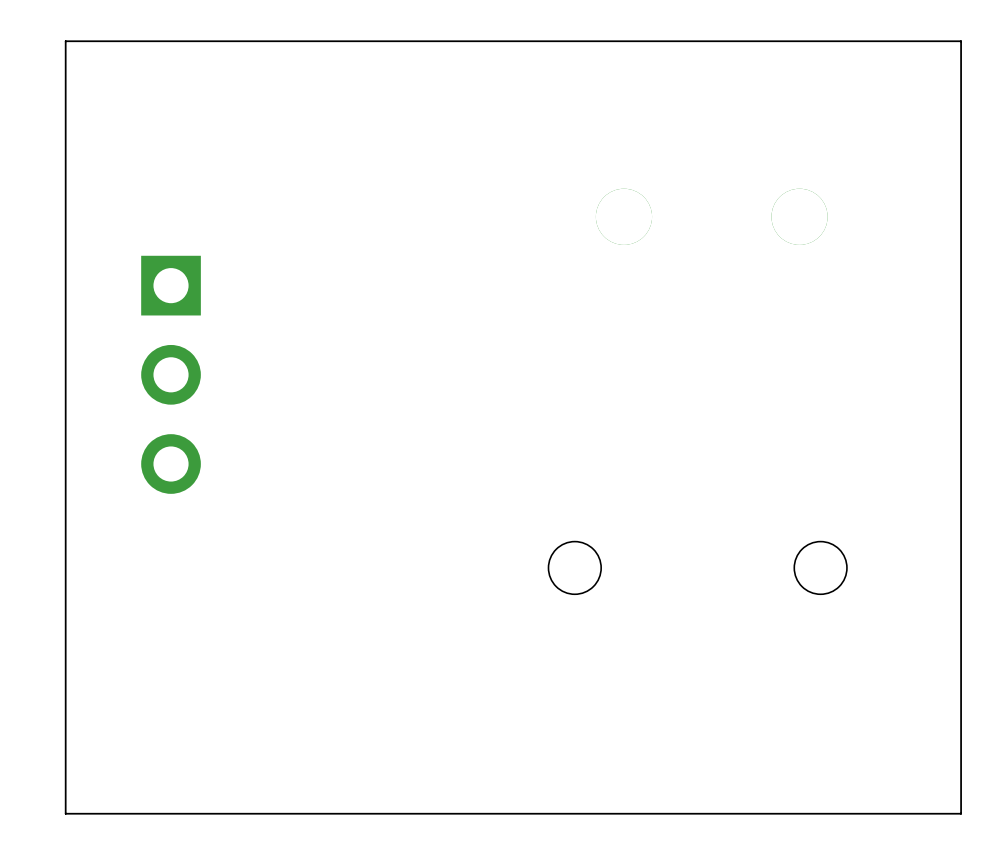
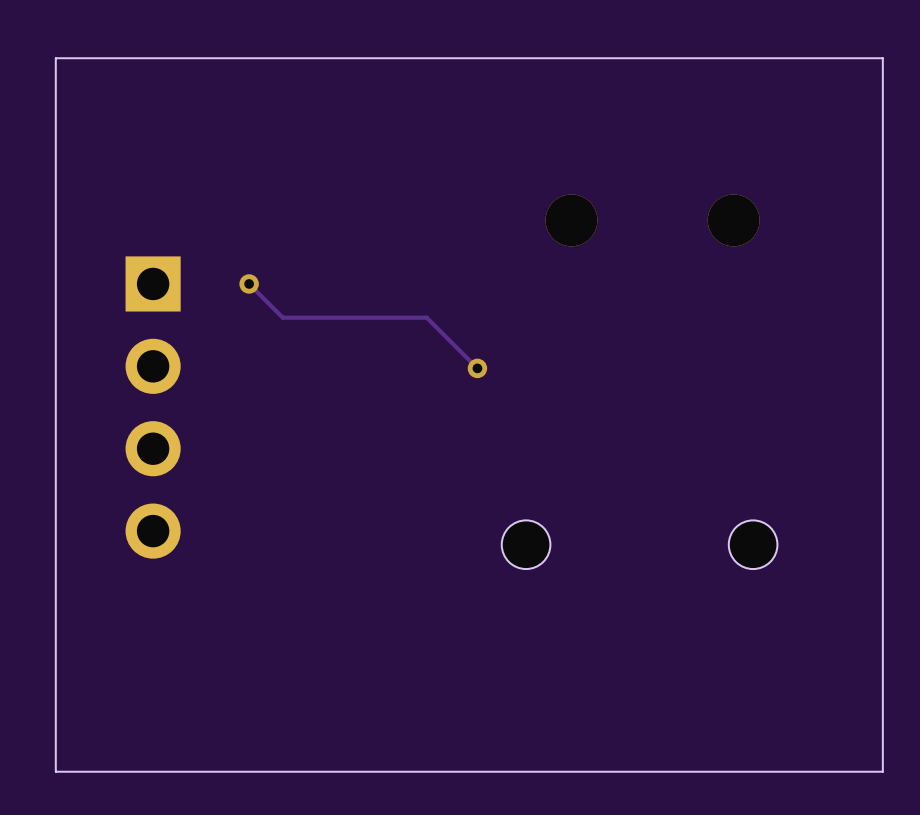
track: none -> (249, 283) (282, 317) (426, 317) (477, 368)
via: none -> (249, 283)
via: none -> (477, 368)
part: none -> (153, 407)

